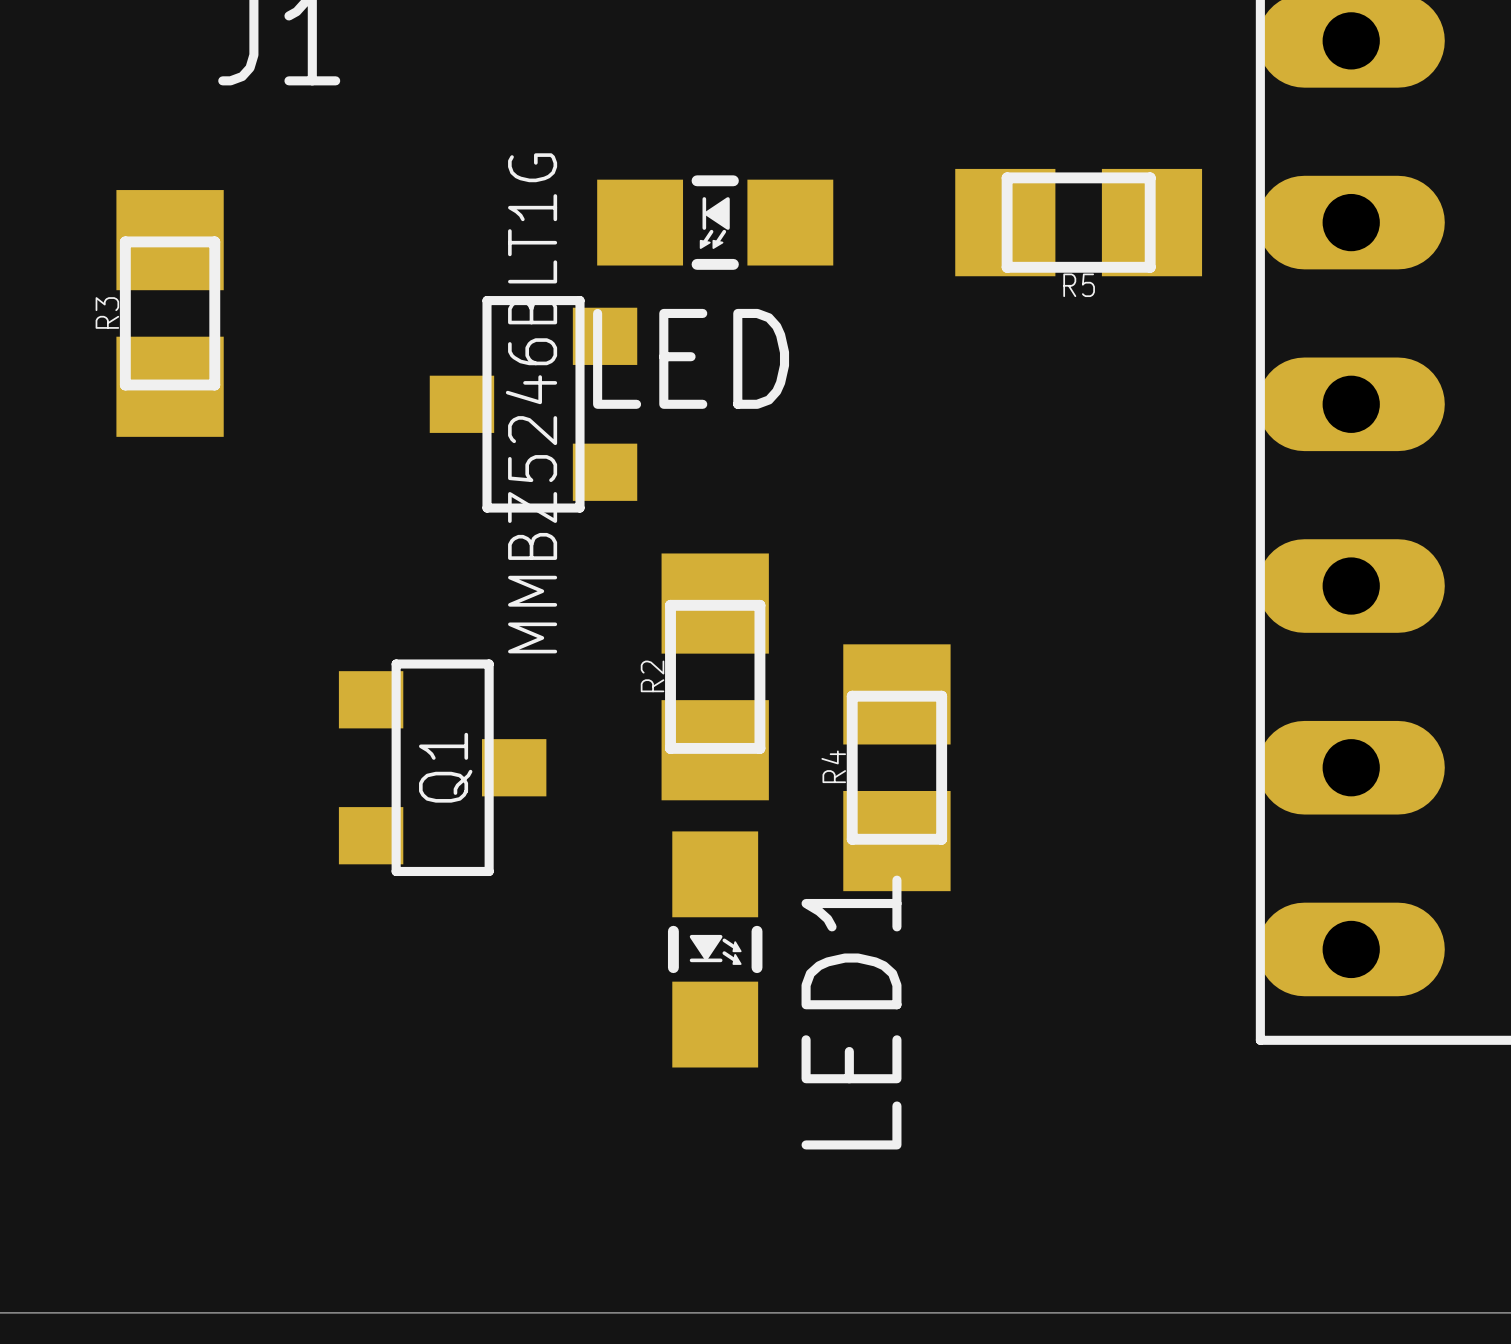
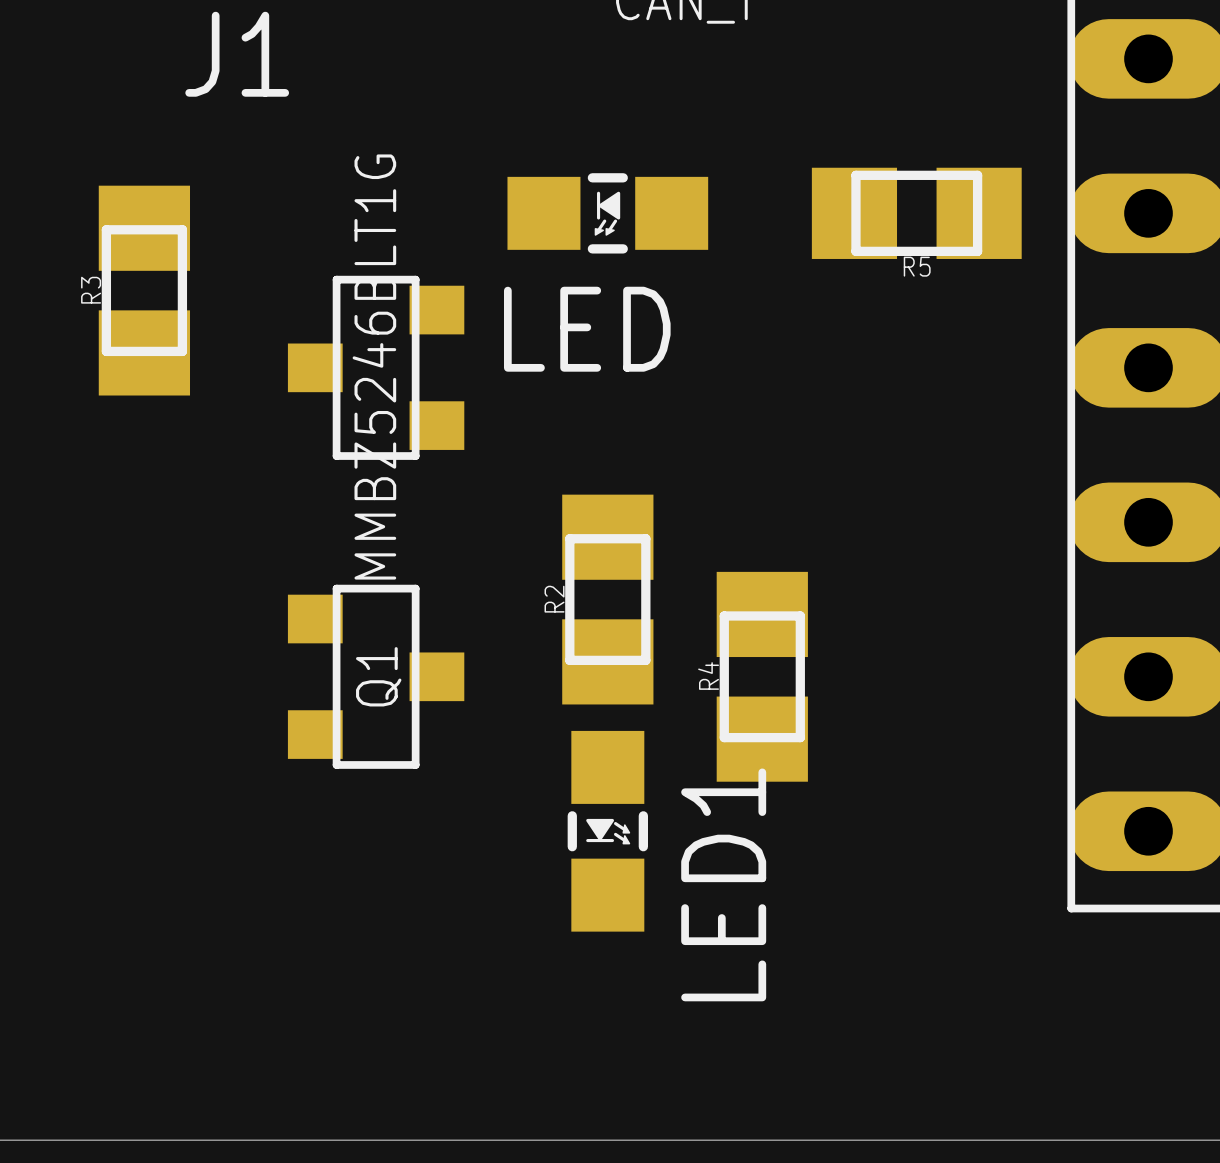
MMBZ5246BLT1G position: (533, 404) -> (376, 367)

